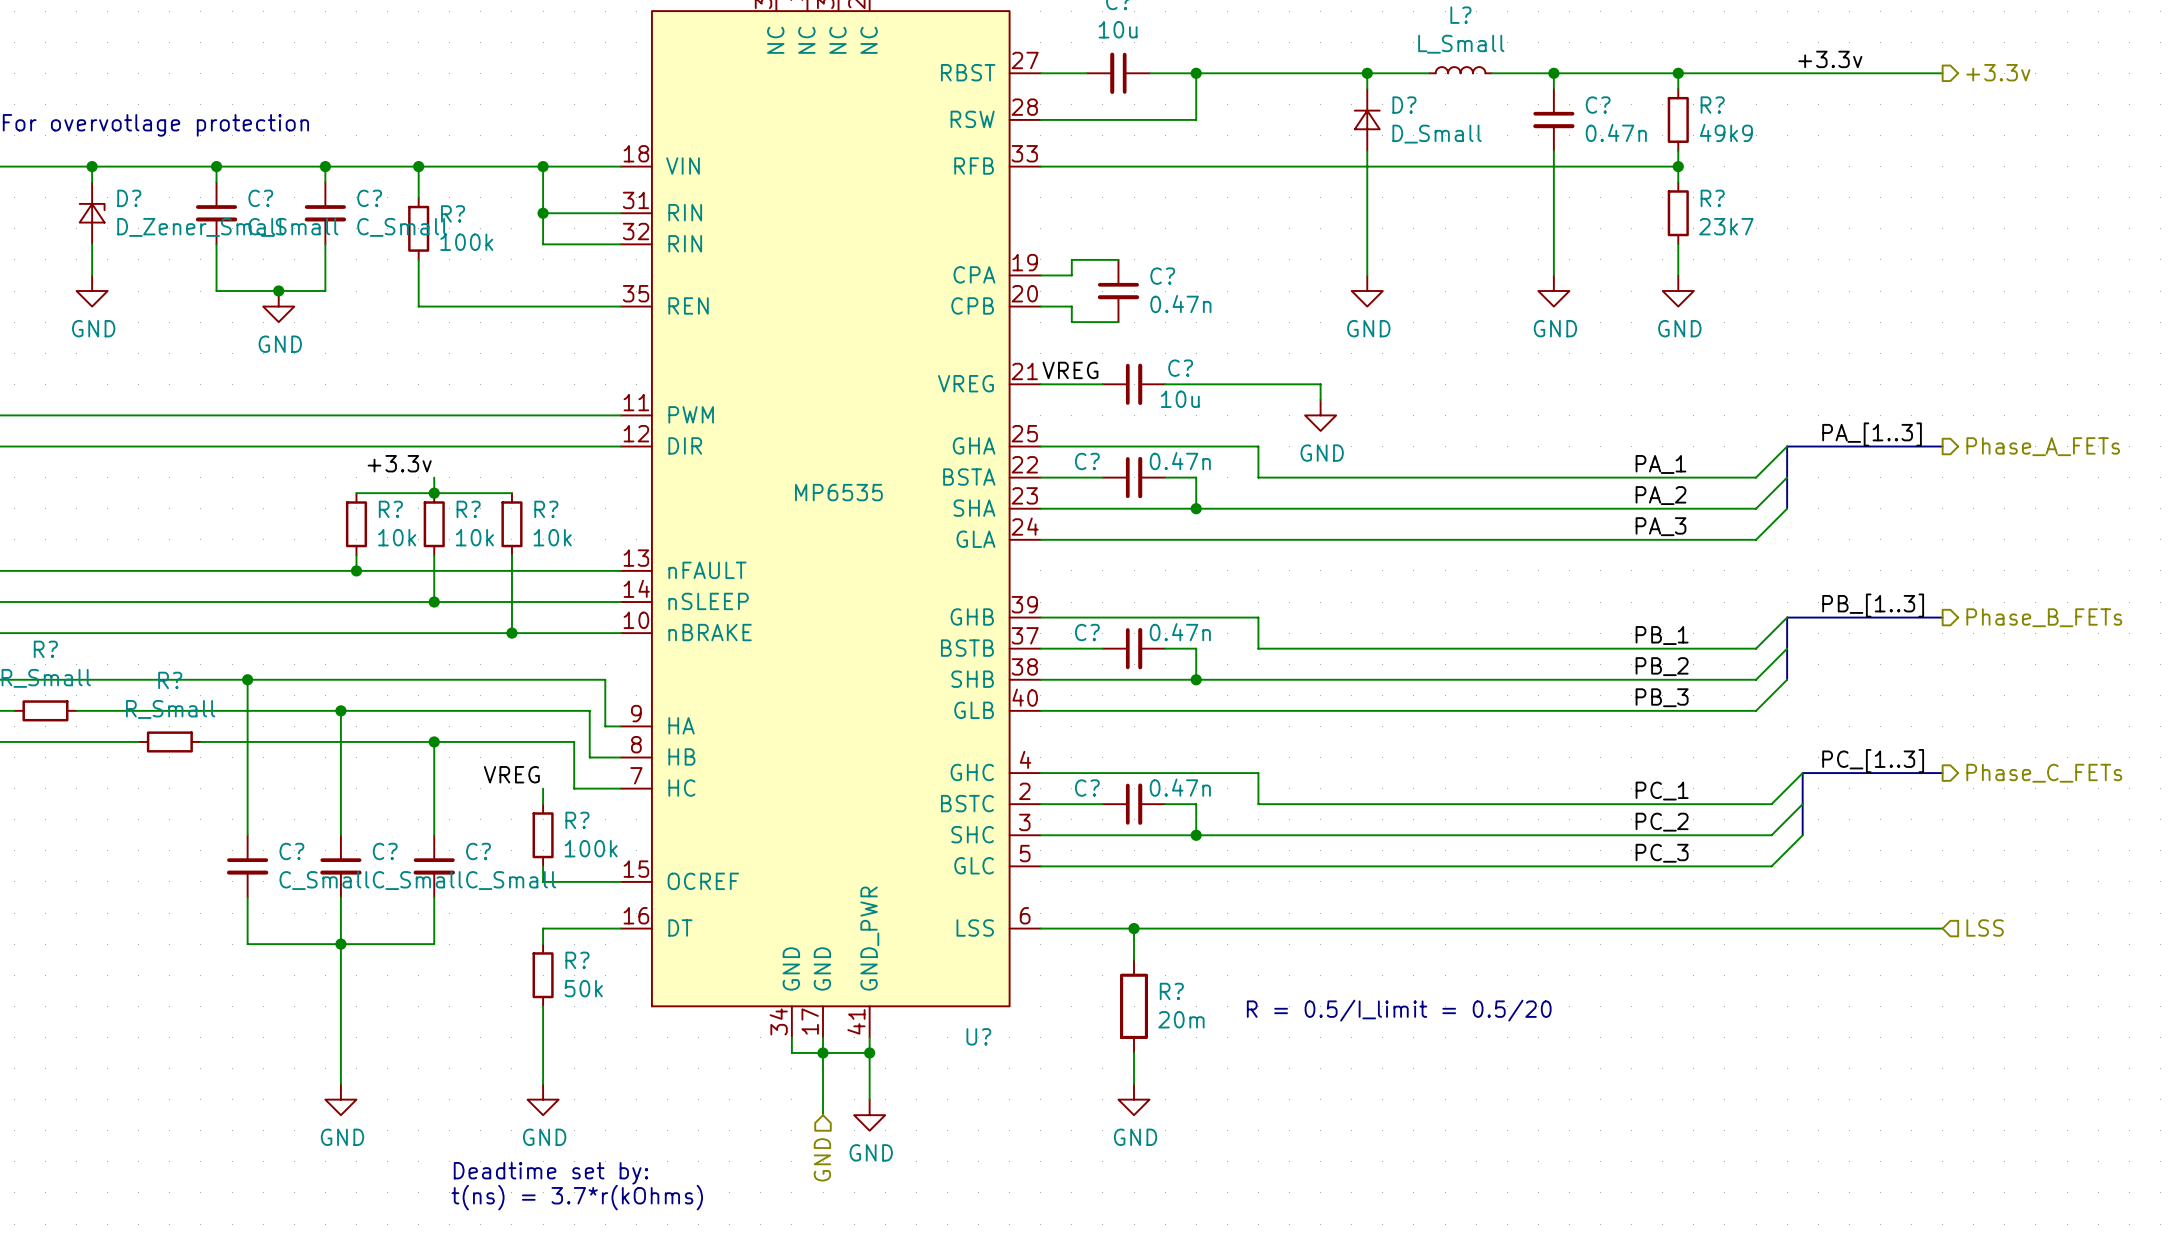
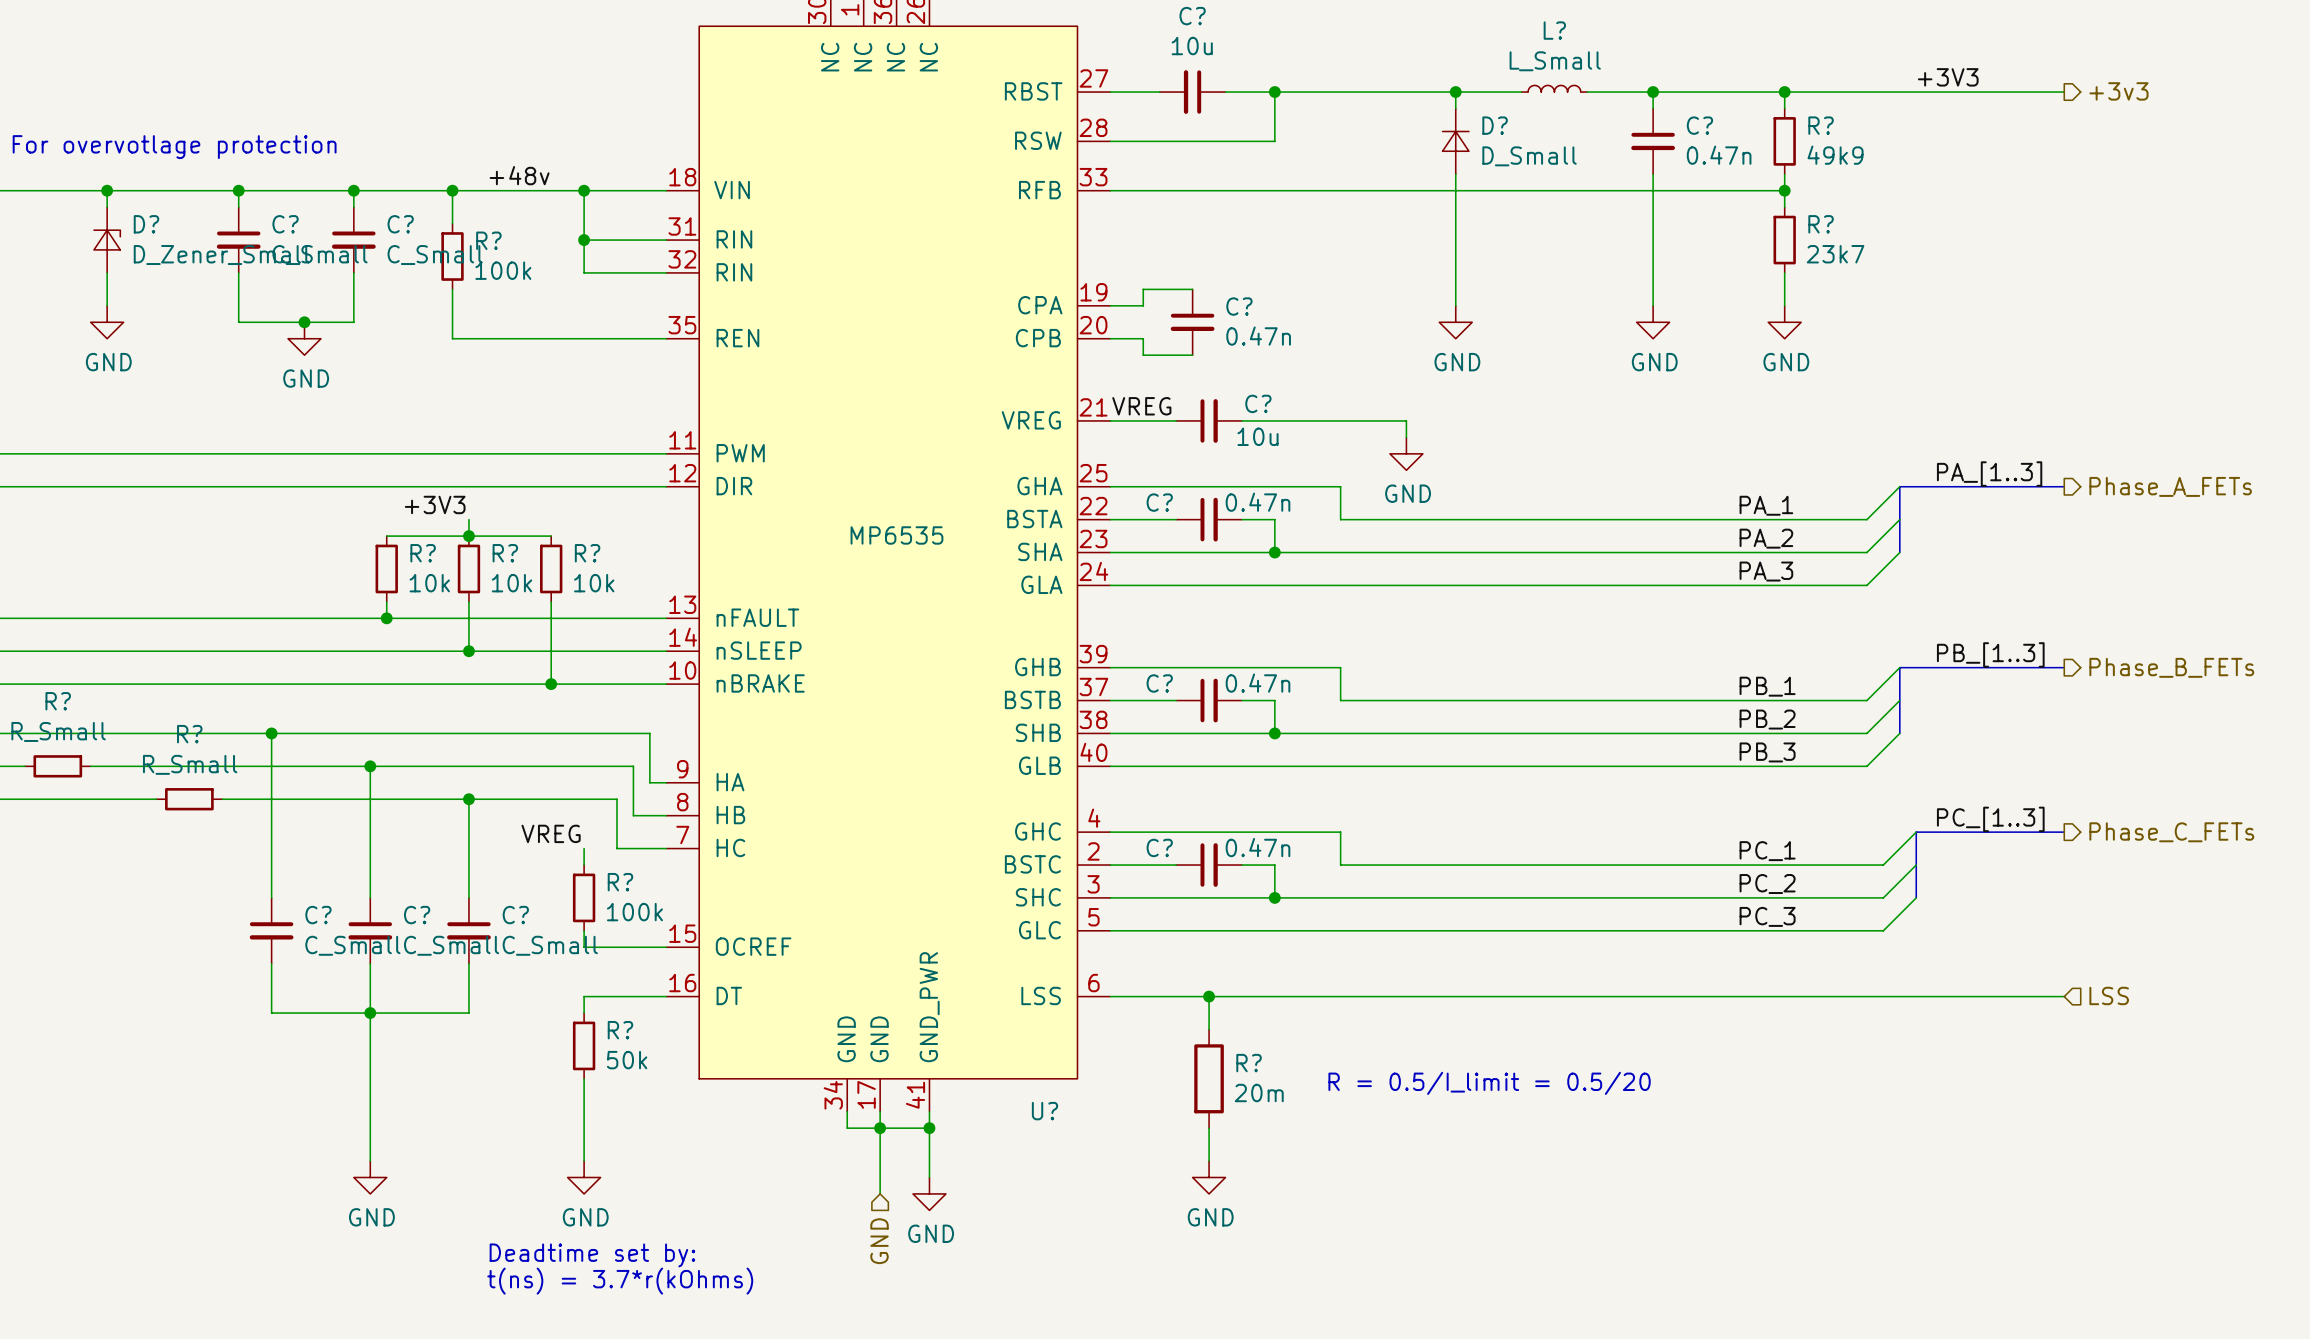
label: +3.3v (1830, 59) -> +3V3 (1948, 77)
hierarchical label: +3.3v (1998, 72) -> +3v3 (2118, 91)
label: none -> +48v (519, 175)
label: +3.3v (399, 463) -> +3V3 (435, 504)

